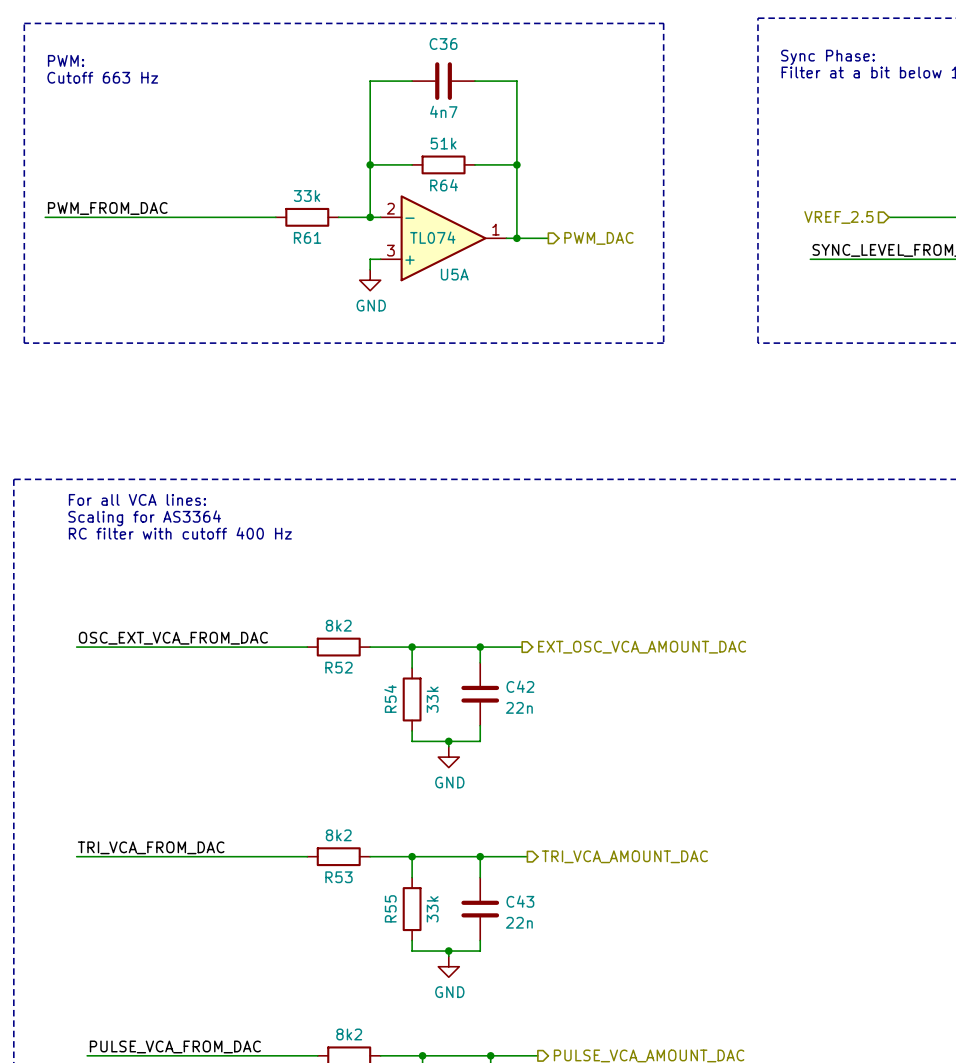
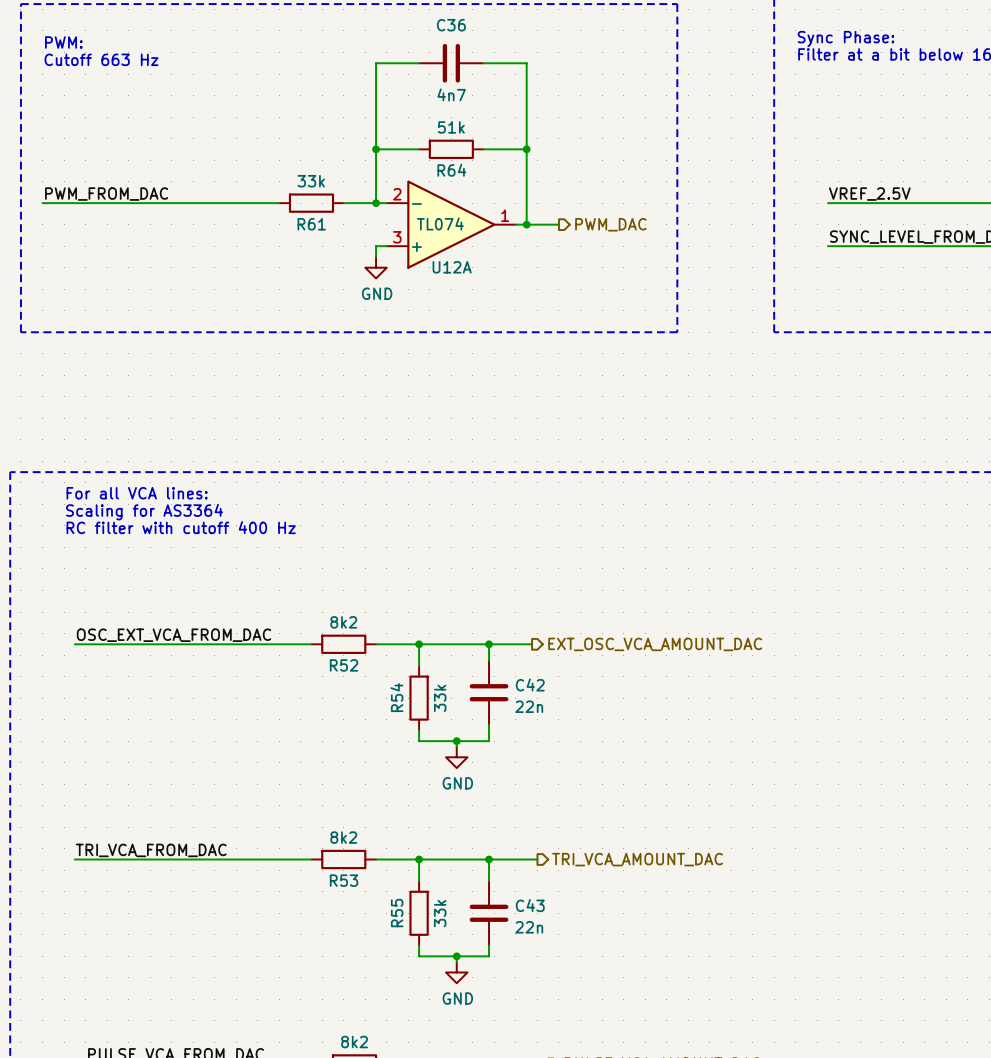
label: none -> VREF_2.5V (869, 194)
wire: none -> (827, 203) (908, 203)
hierarchical label: VREF_2.5 (838, 217) -> none
U5A name: U5A (454, 274) -> U12A (452, 267)

